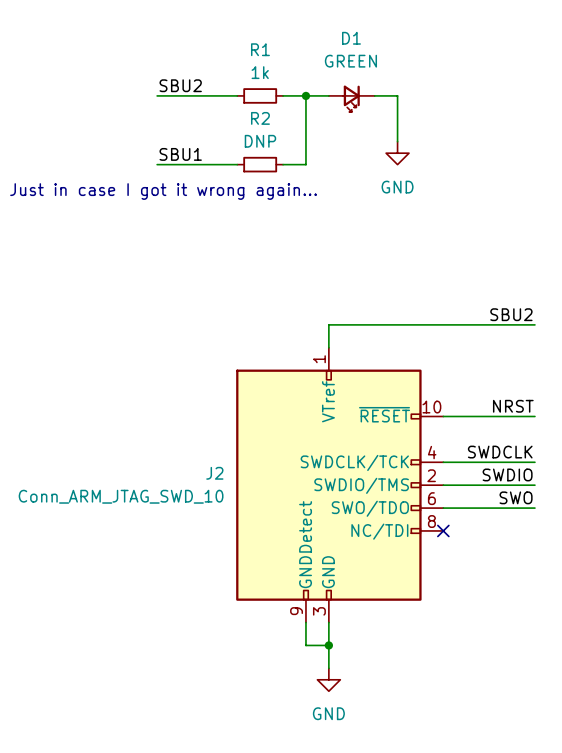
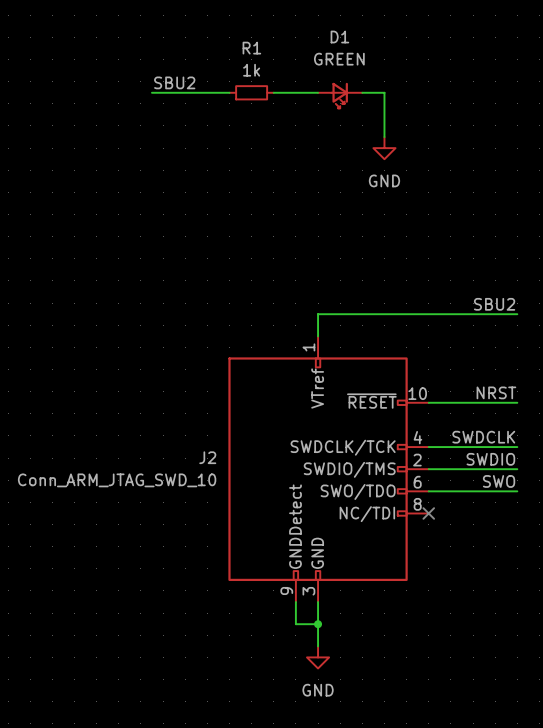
wire: (305, 95) (305, 164) (283, 164) -> none
junction: (305, 95) -> none
label: SBU1 (180, 154) -> none
wire: (157, 164) (237, 164) -> none
R2: DNP (260, 164) -> none
text: Just in case I got it wrong again... (163, 191) -> none

